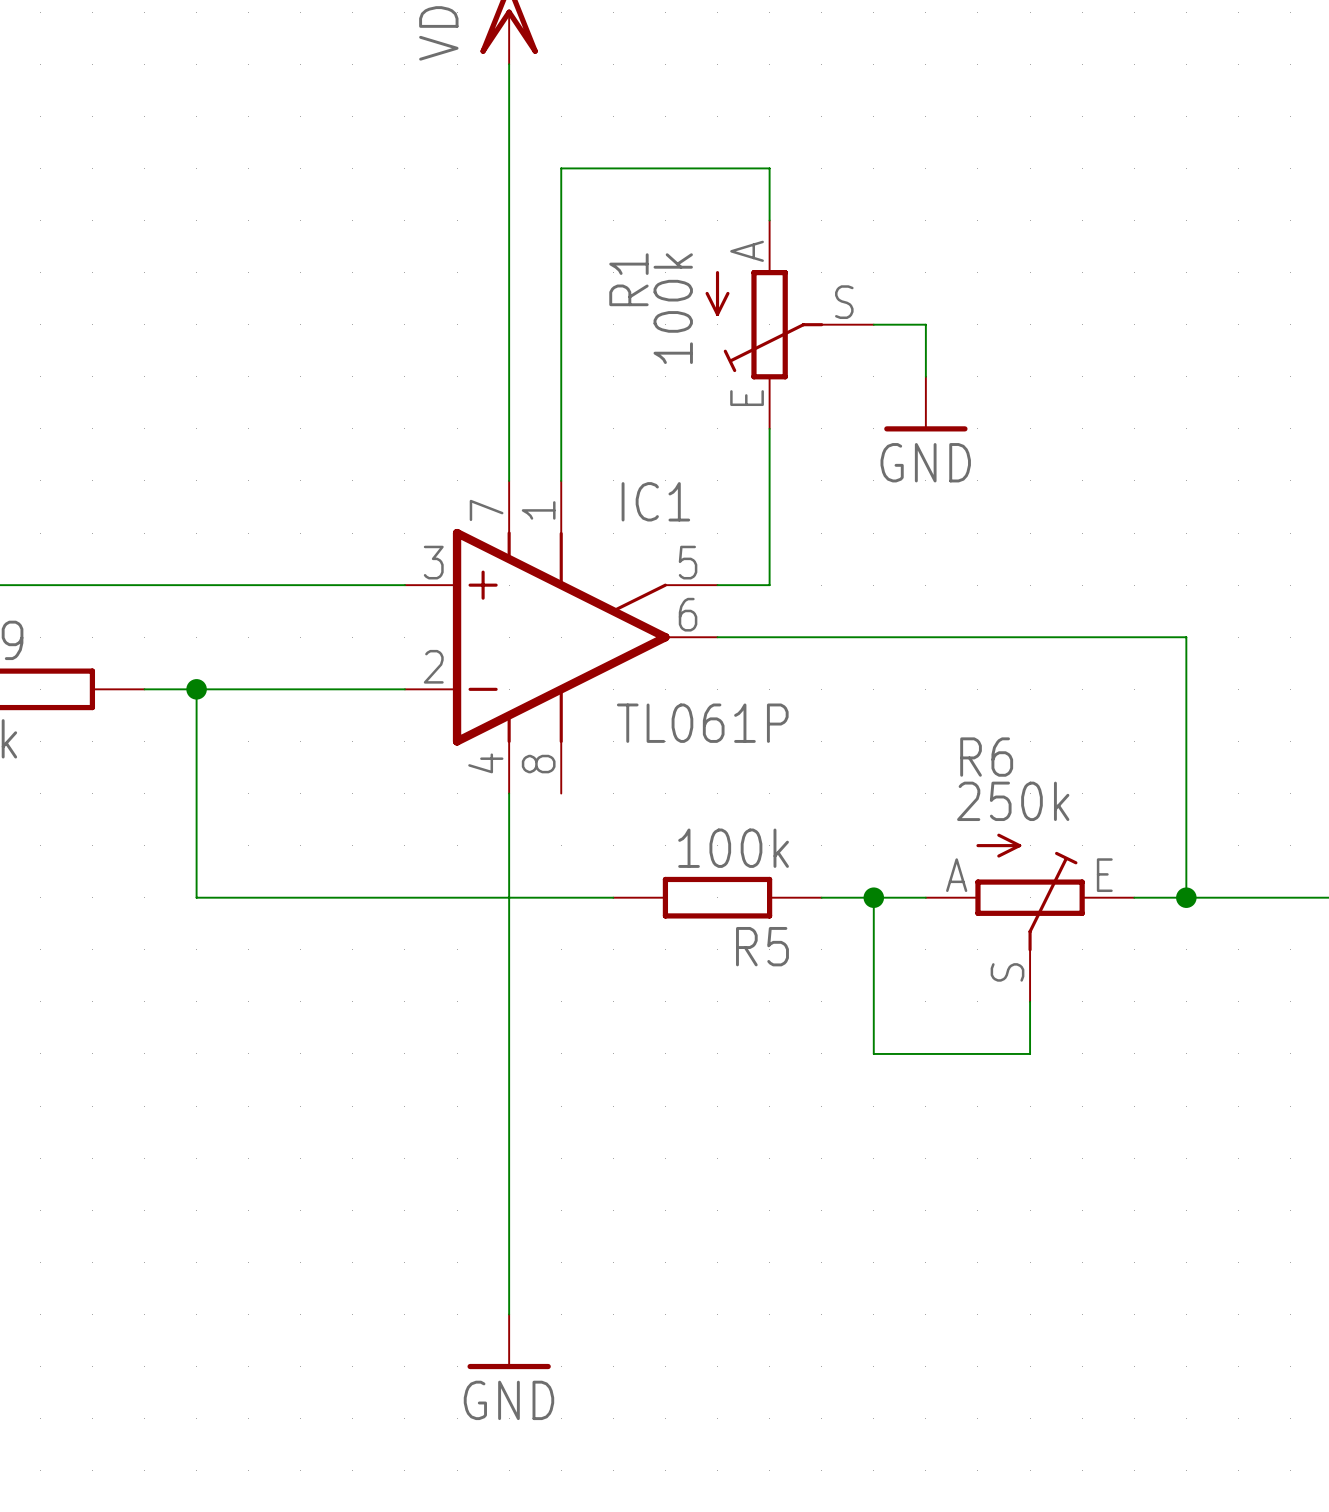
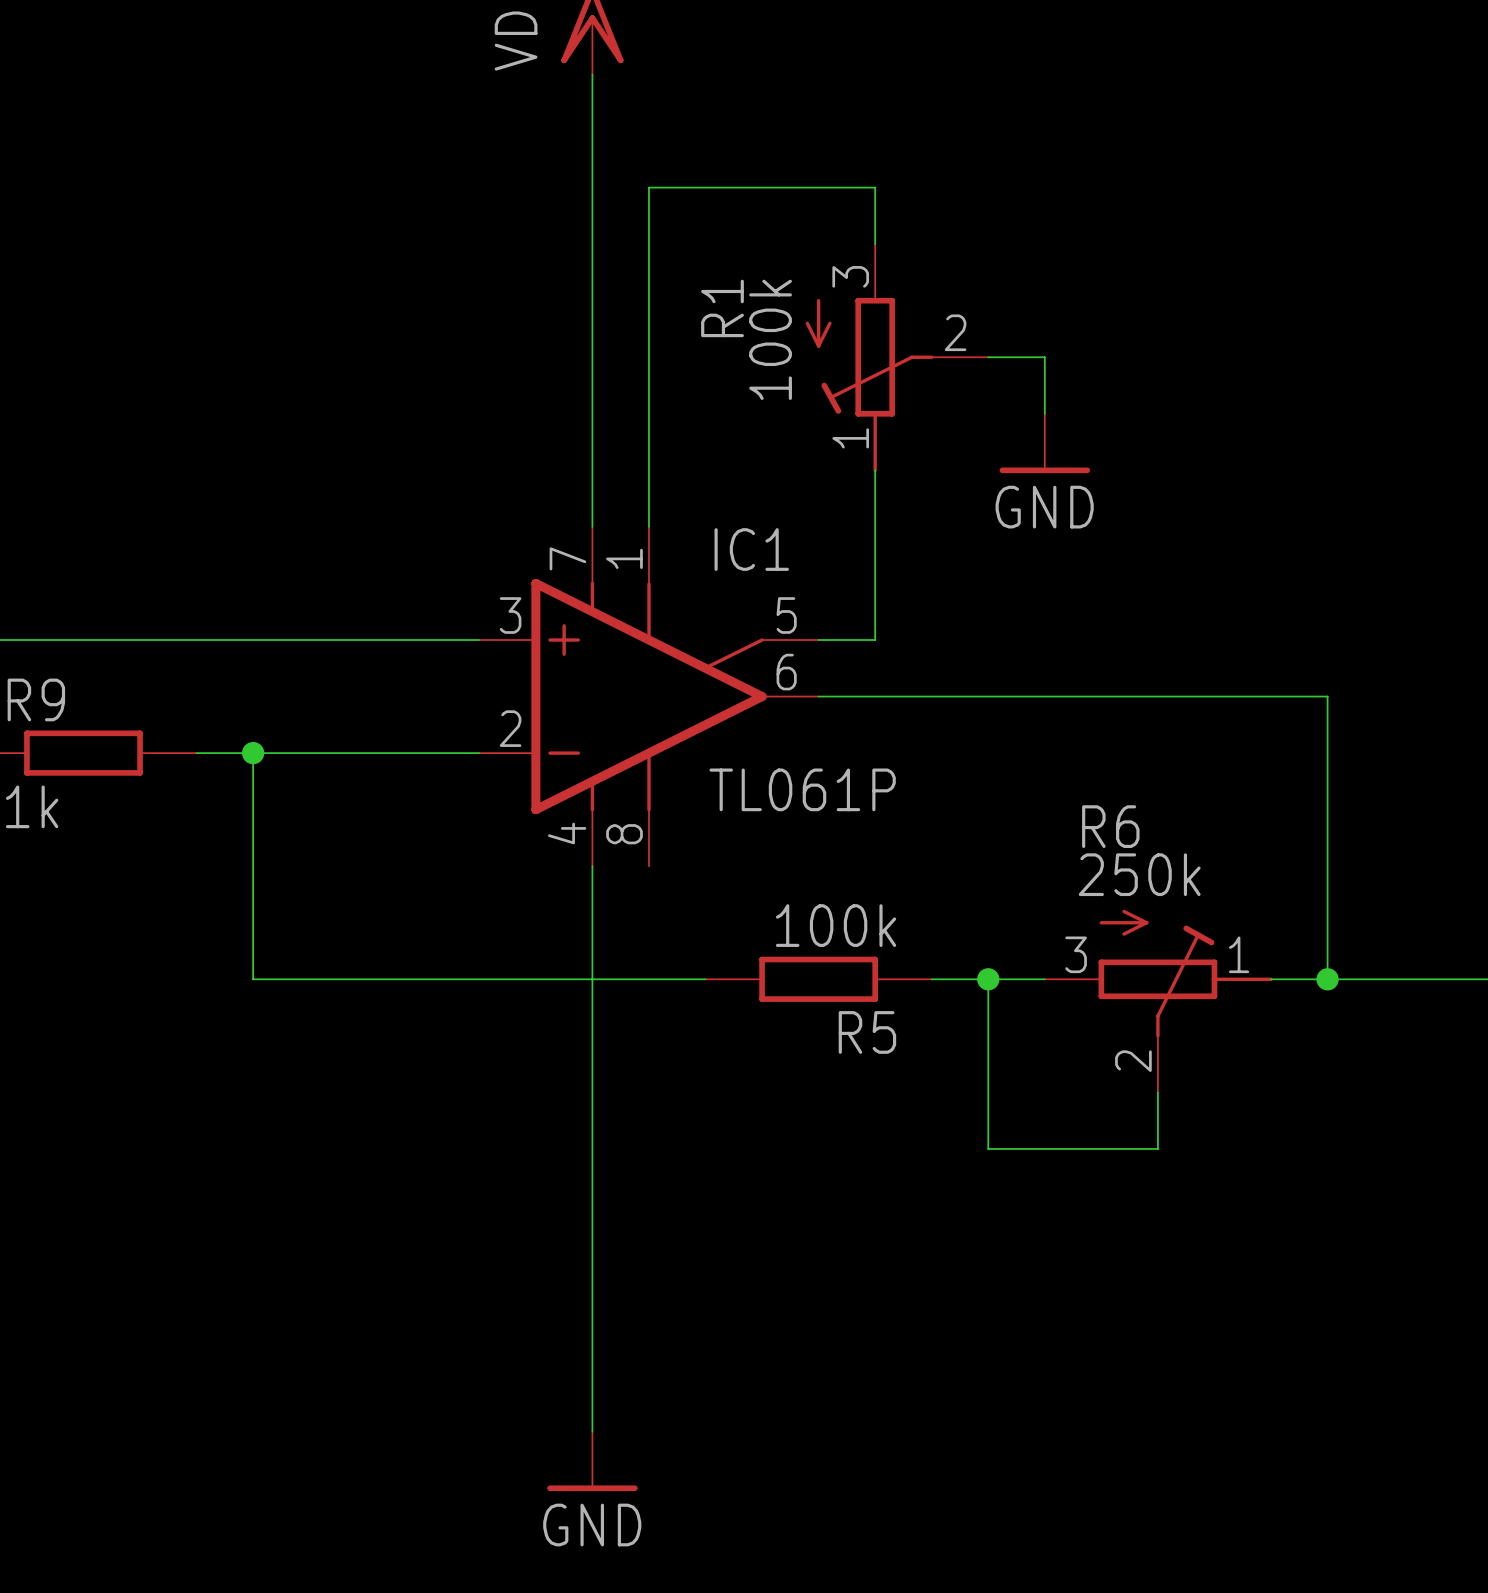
R1 symbol: [705, 220, 874, 429] -> [805, 244, 989, 473]
R6 symbol: [925, 833, 1135, 1002] -> [1044, 909, 1273, 1093]

